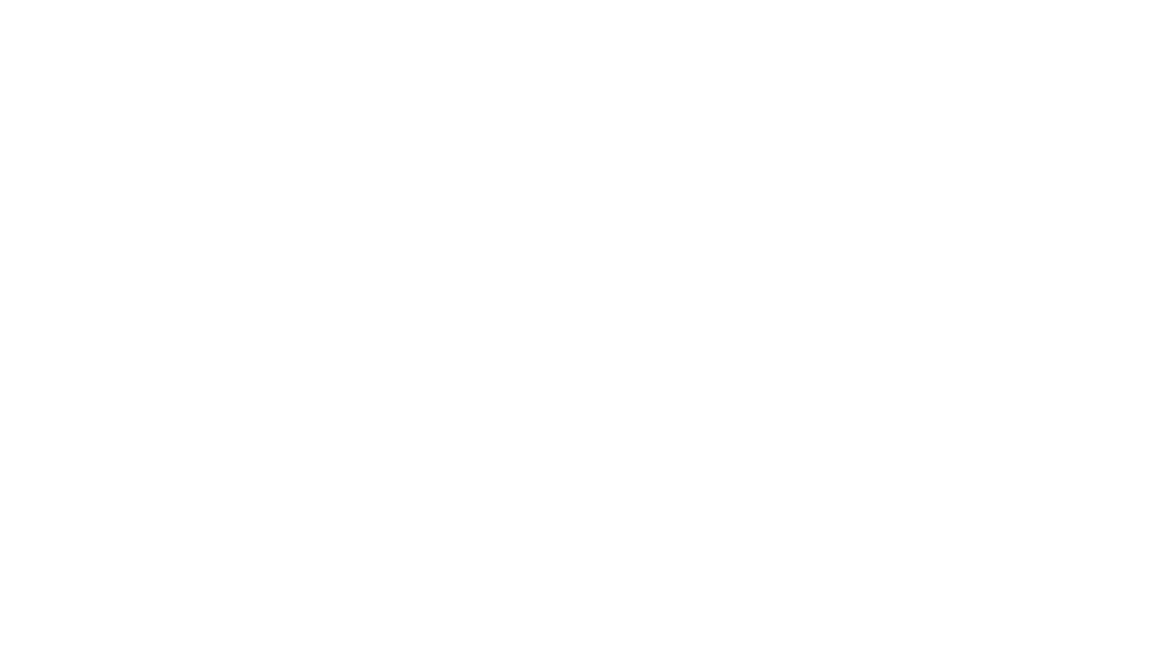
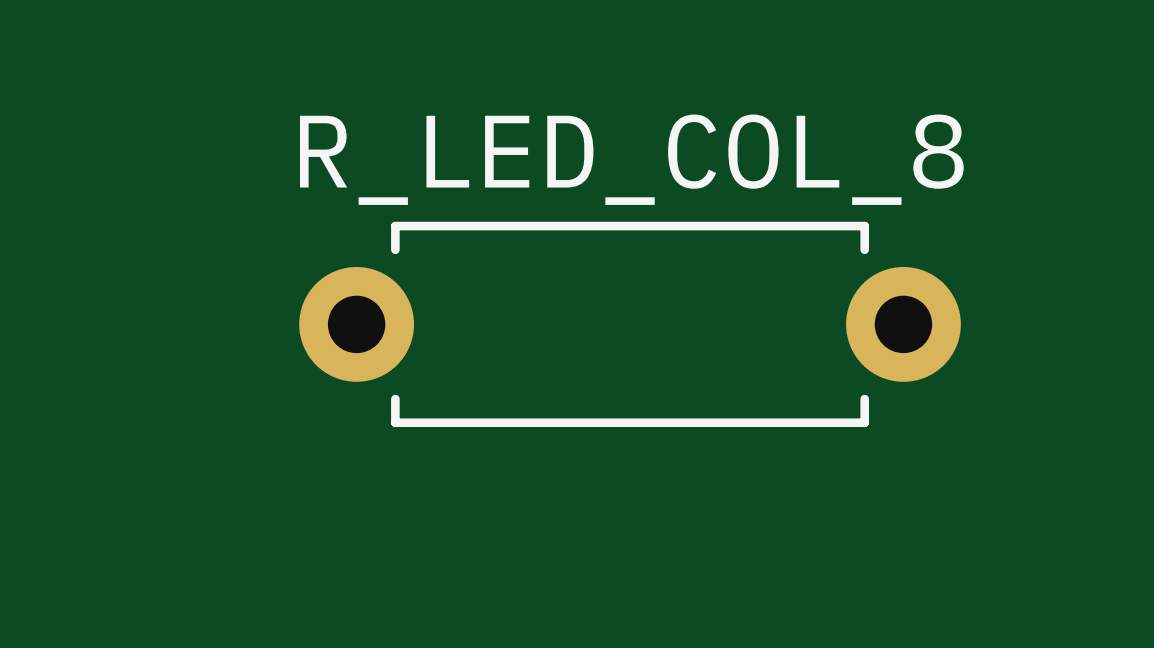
R_LED_COL_8: none -> (630, 324)

